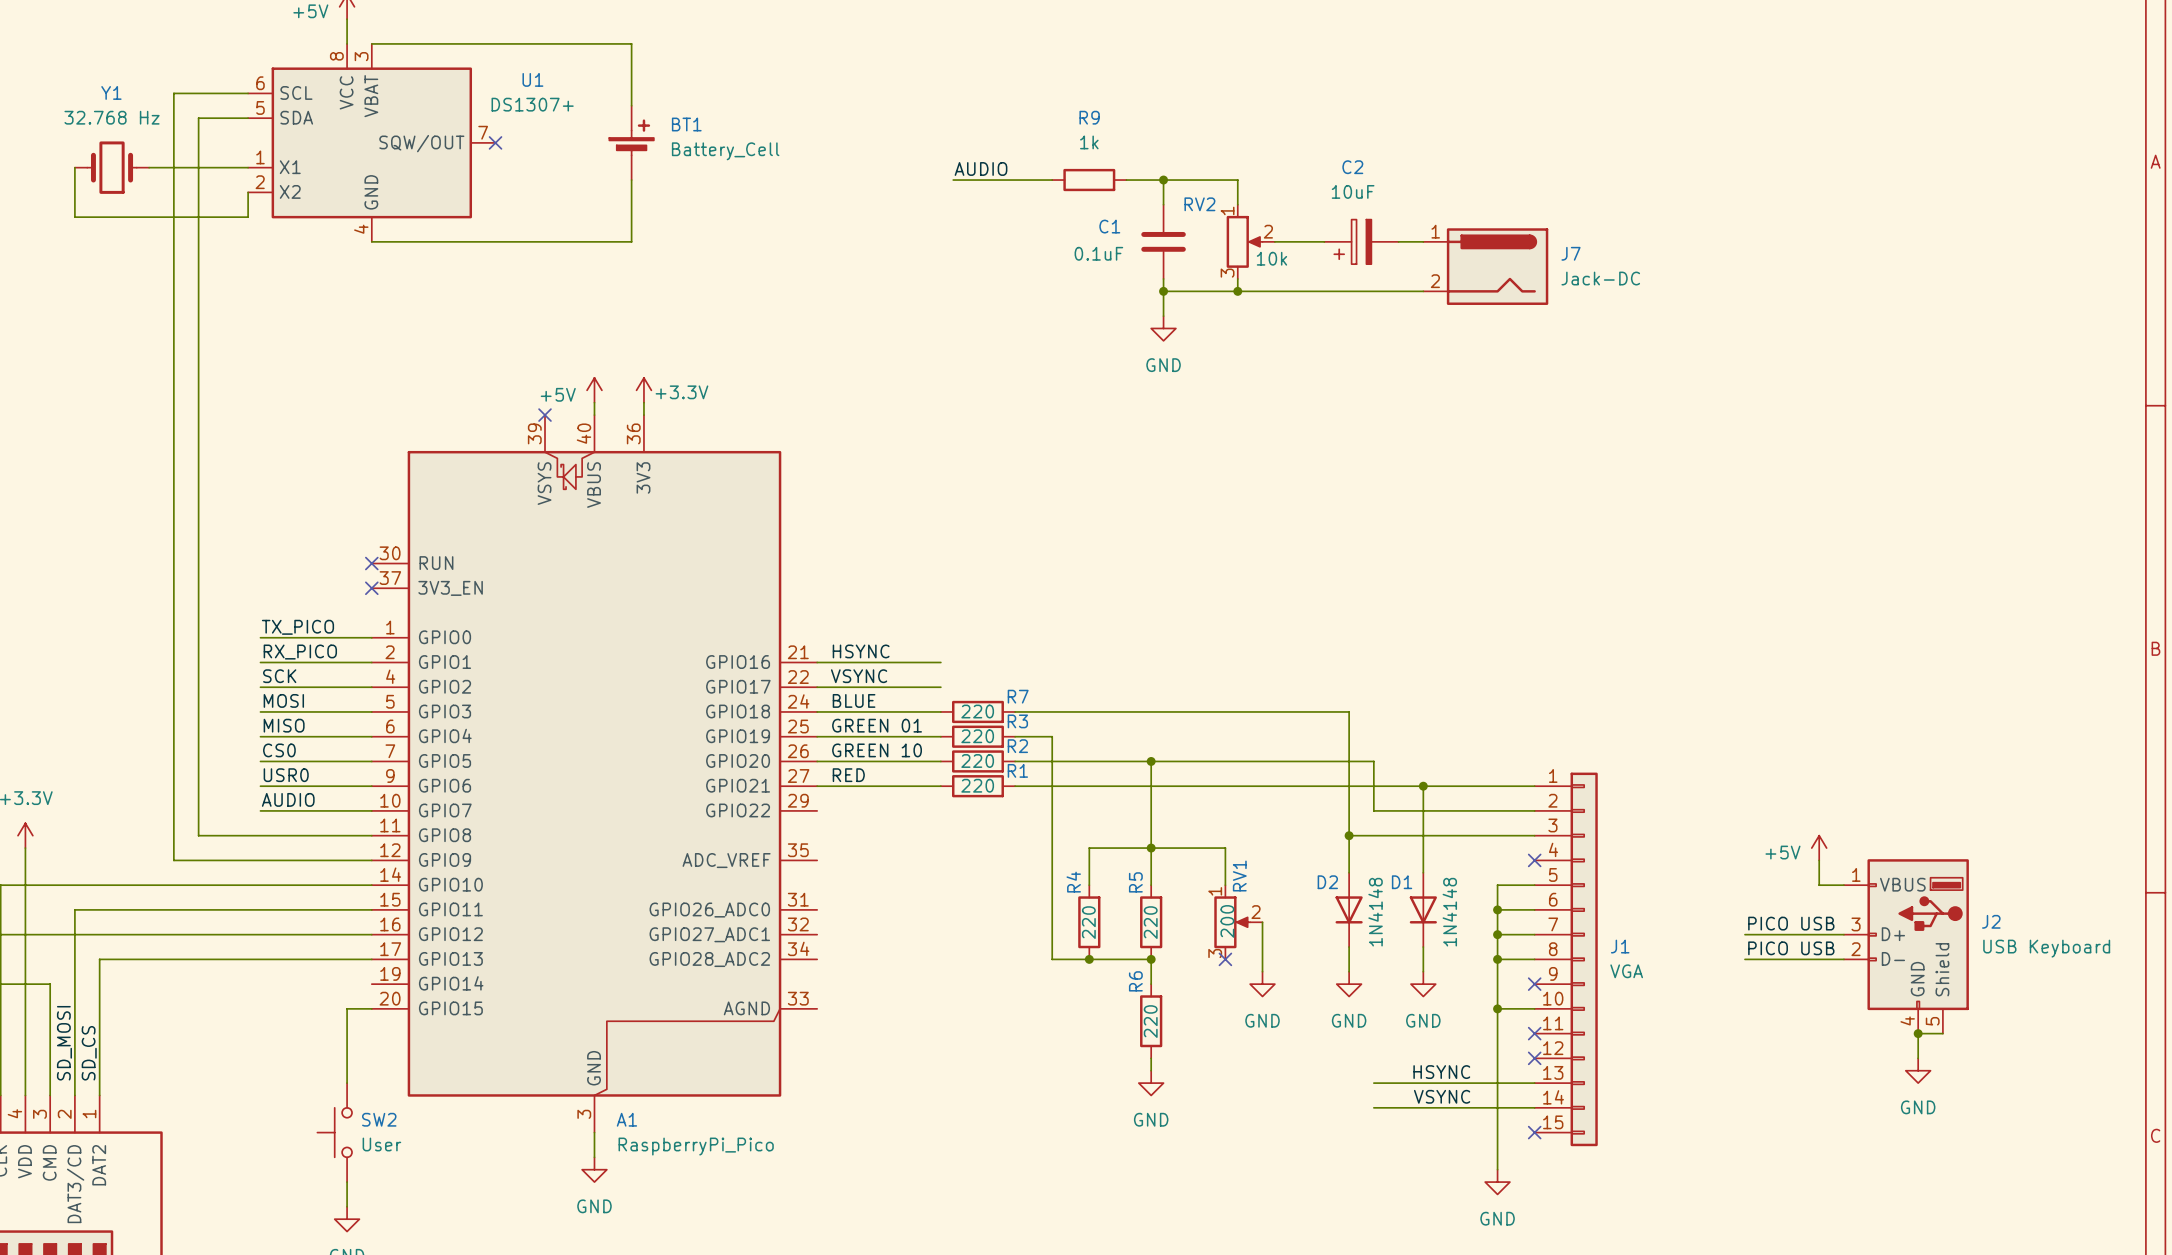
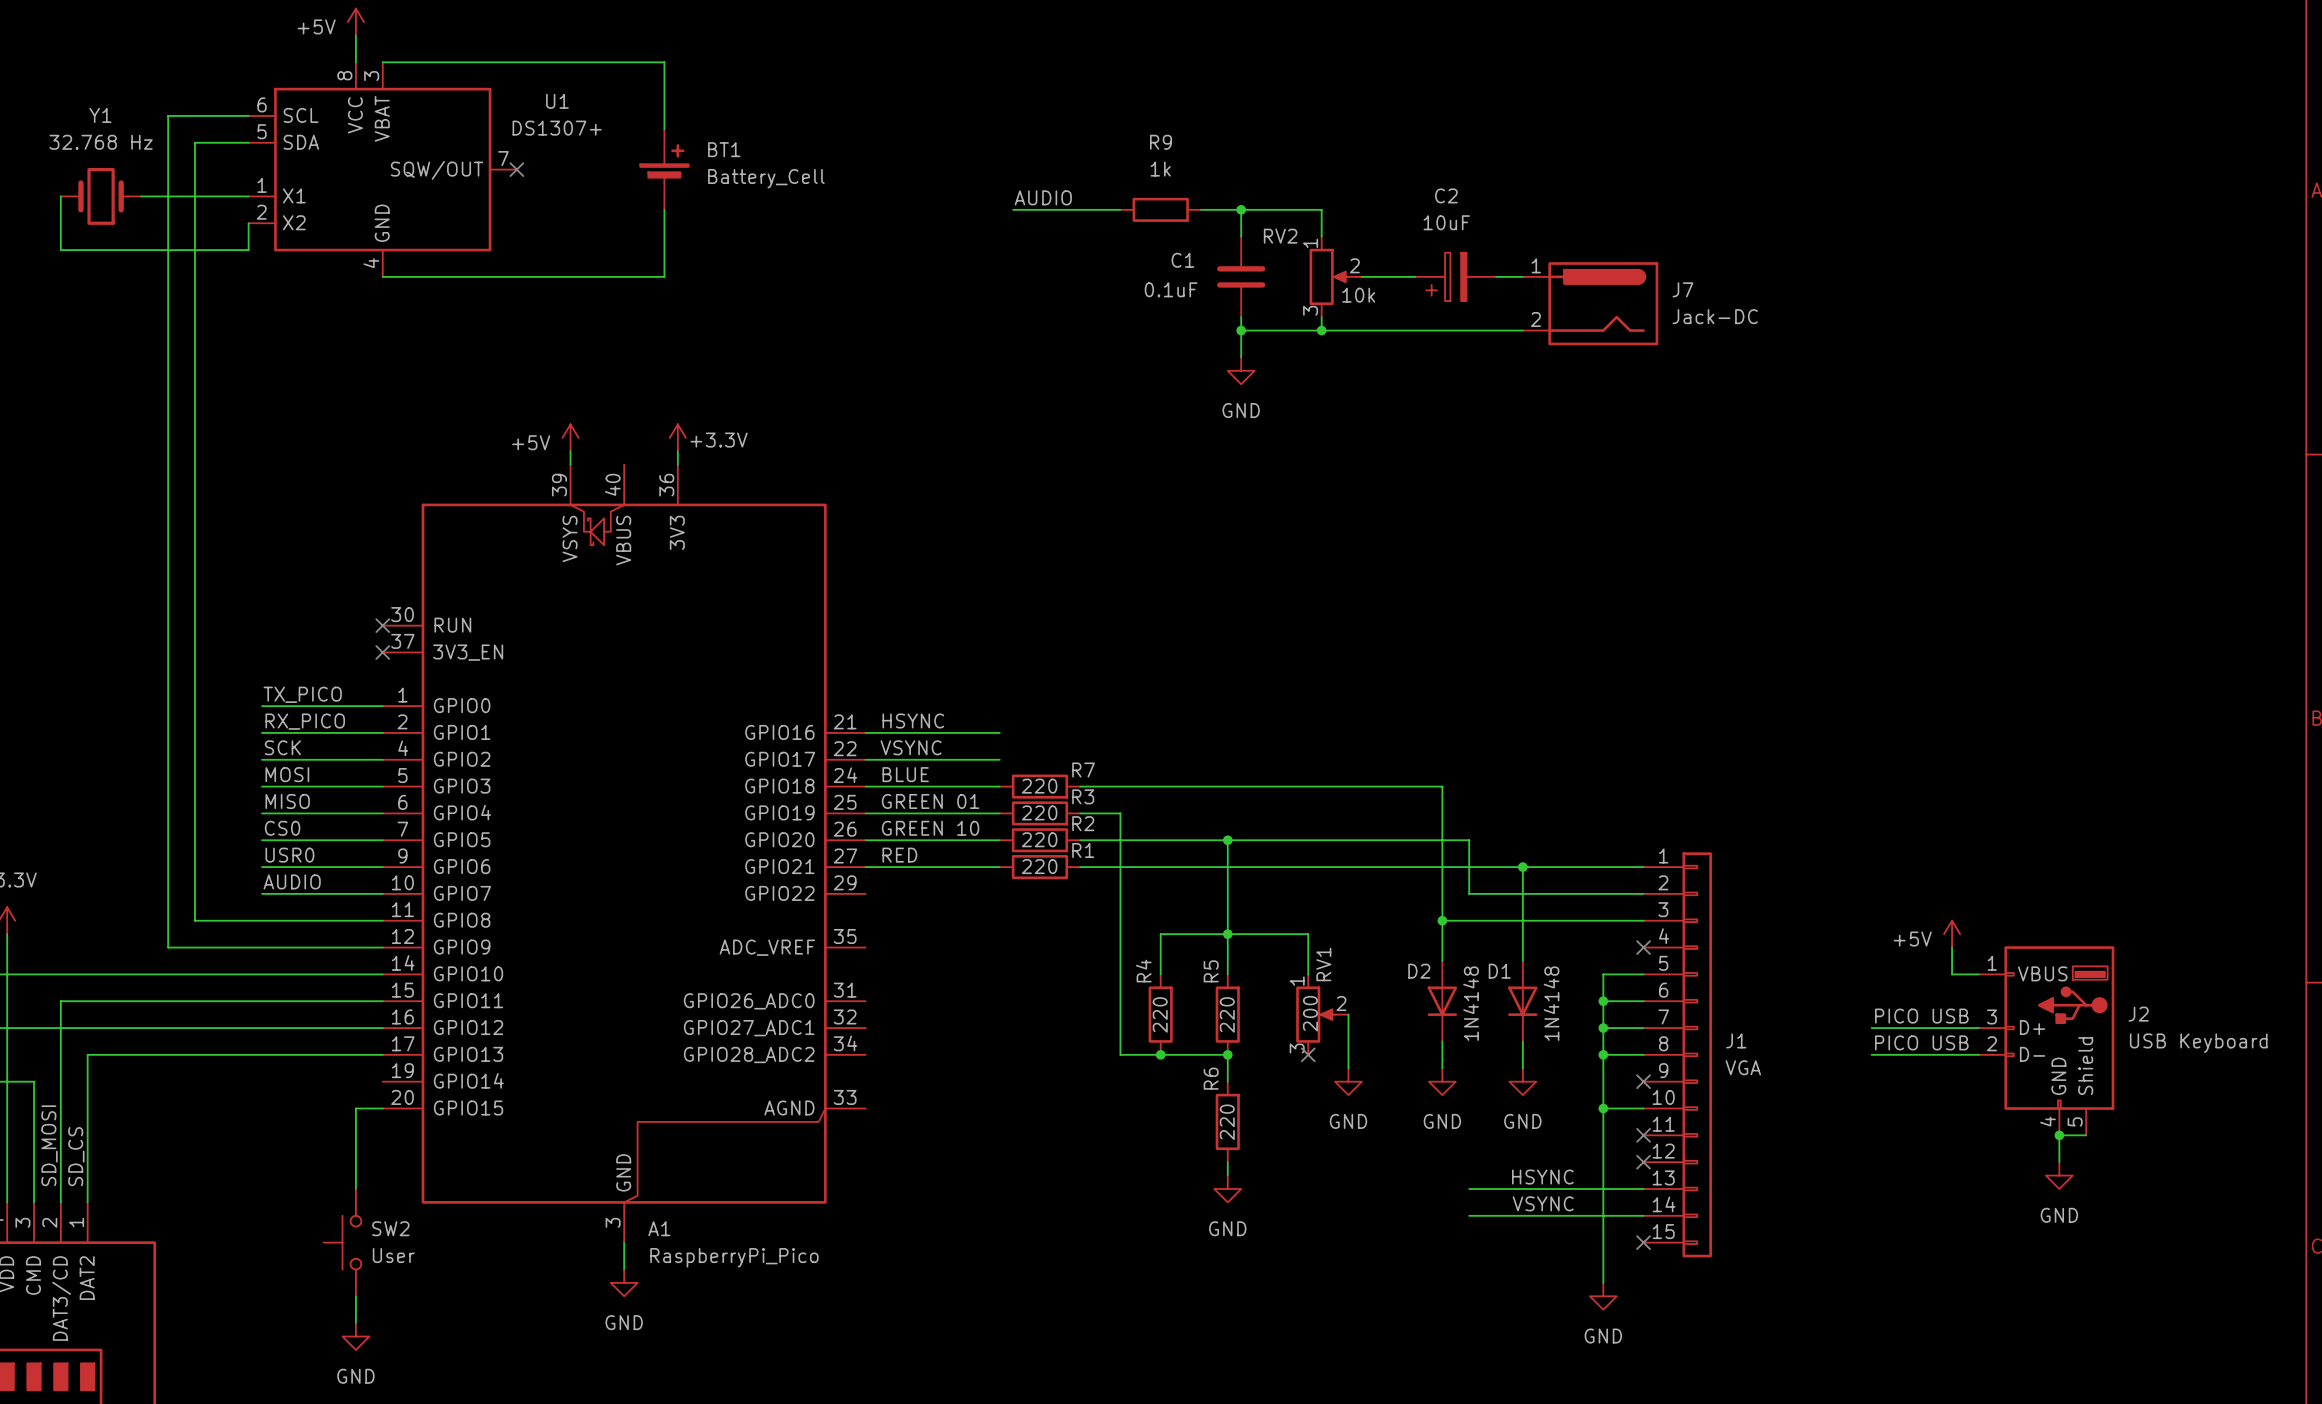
power symbol position: +5V (594, 390) -> +5V (570, 437)
wire: (594, 402) (594, 415) -> (570, 451) (570, 464)
no-connect mark: (545, 415) -> none

